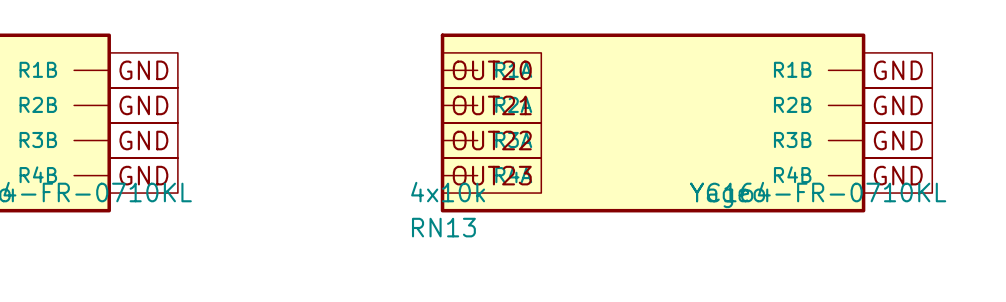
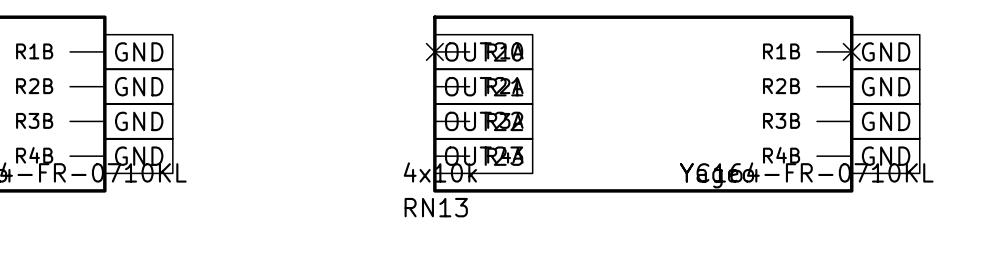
no-connect mark: none -> (434, 51)
no-connect mark: none -> (851, 51)

